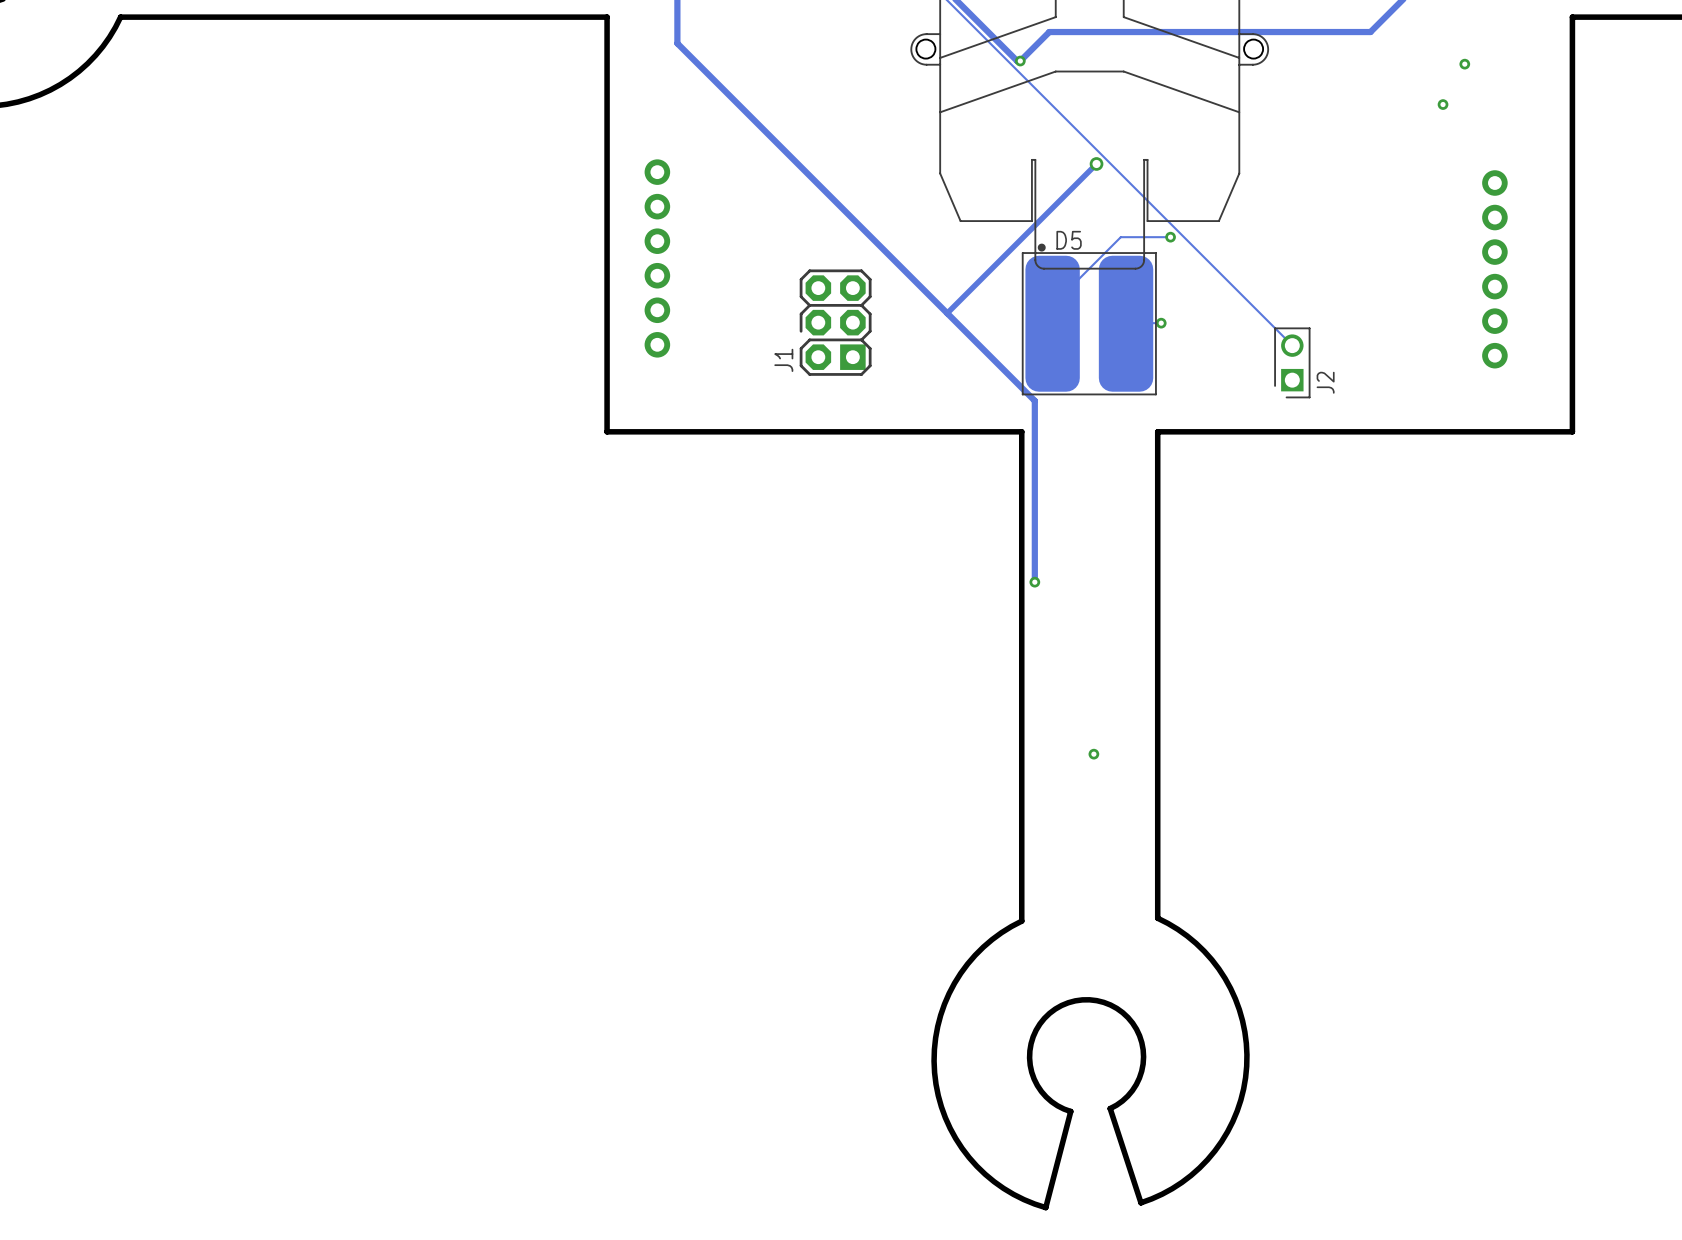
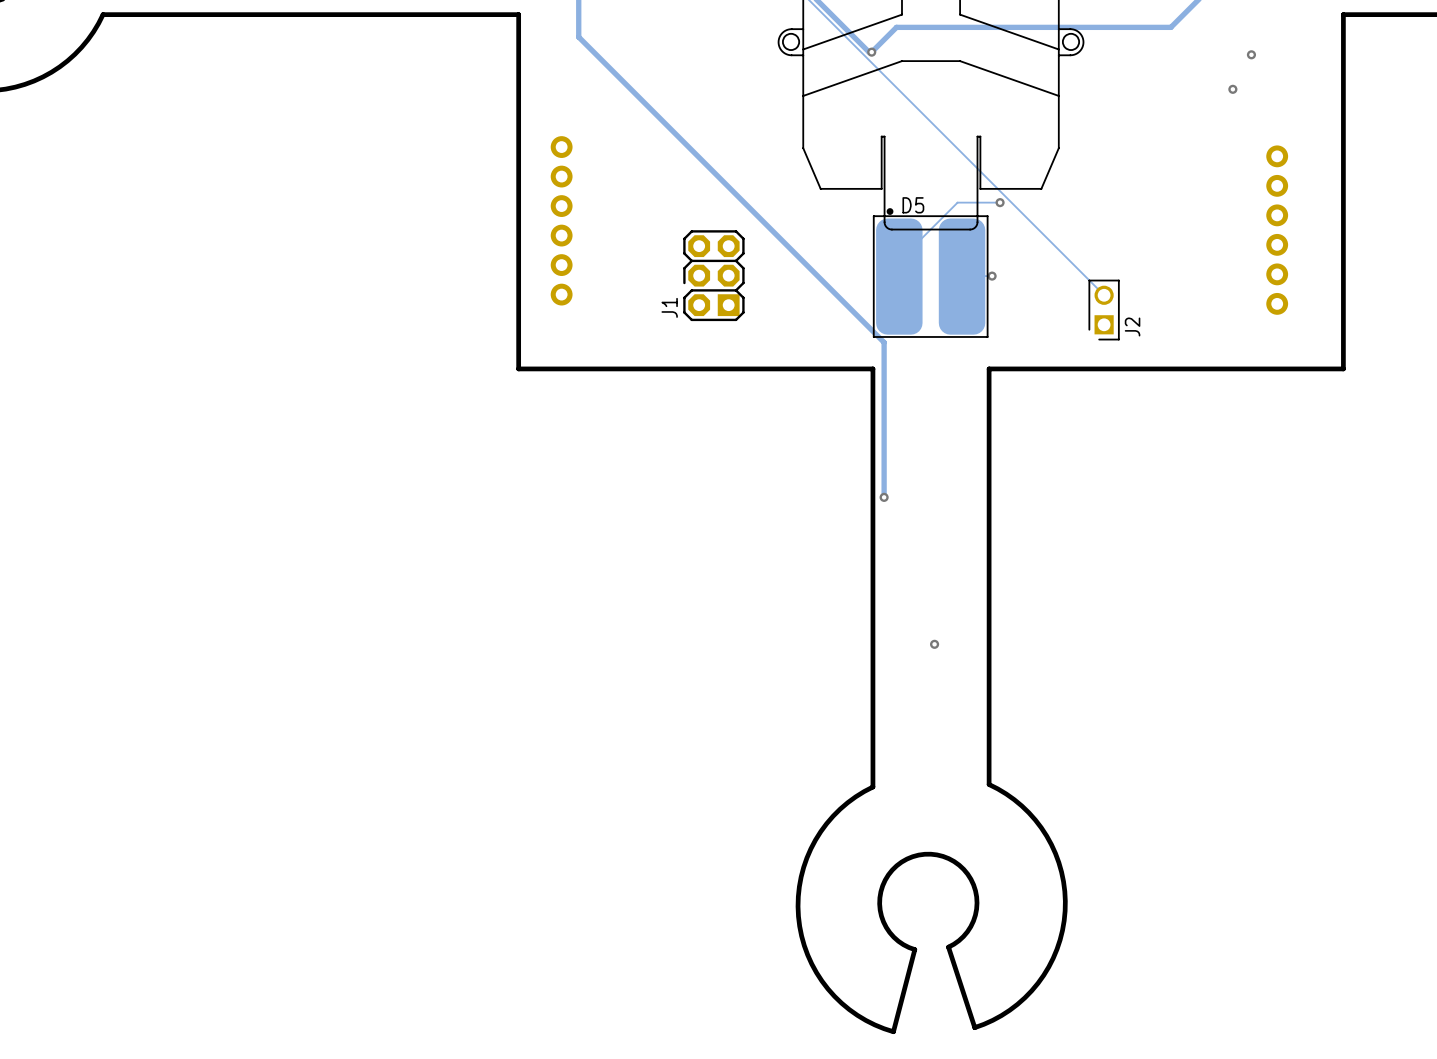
track: (1096, 163) (947, 313) -> none
via: (1096, 163) -> none

